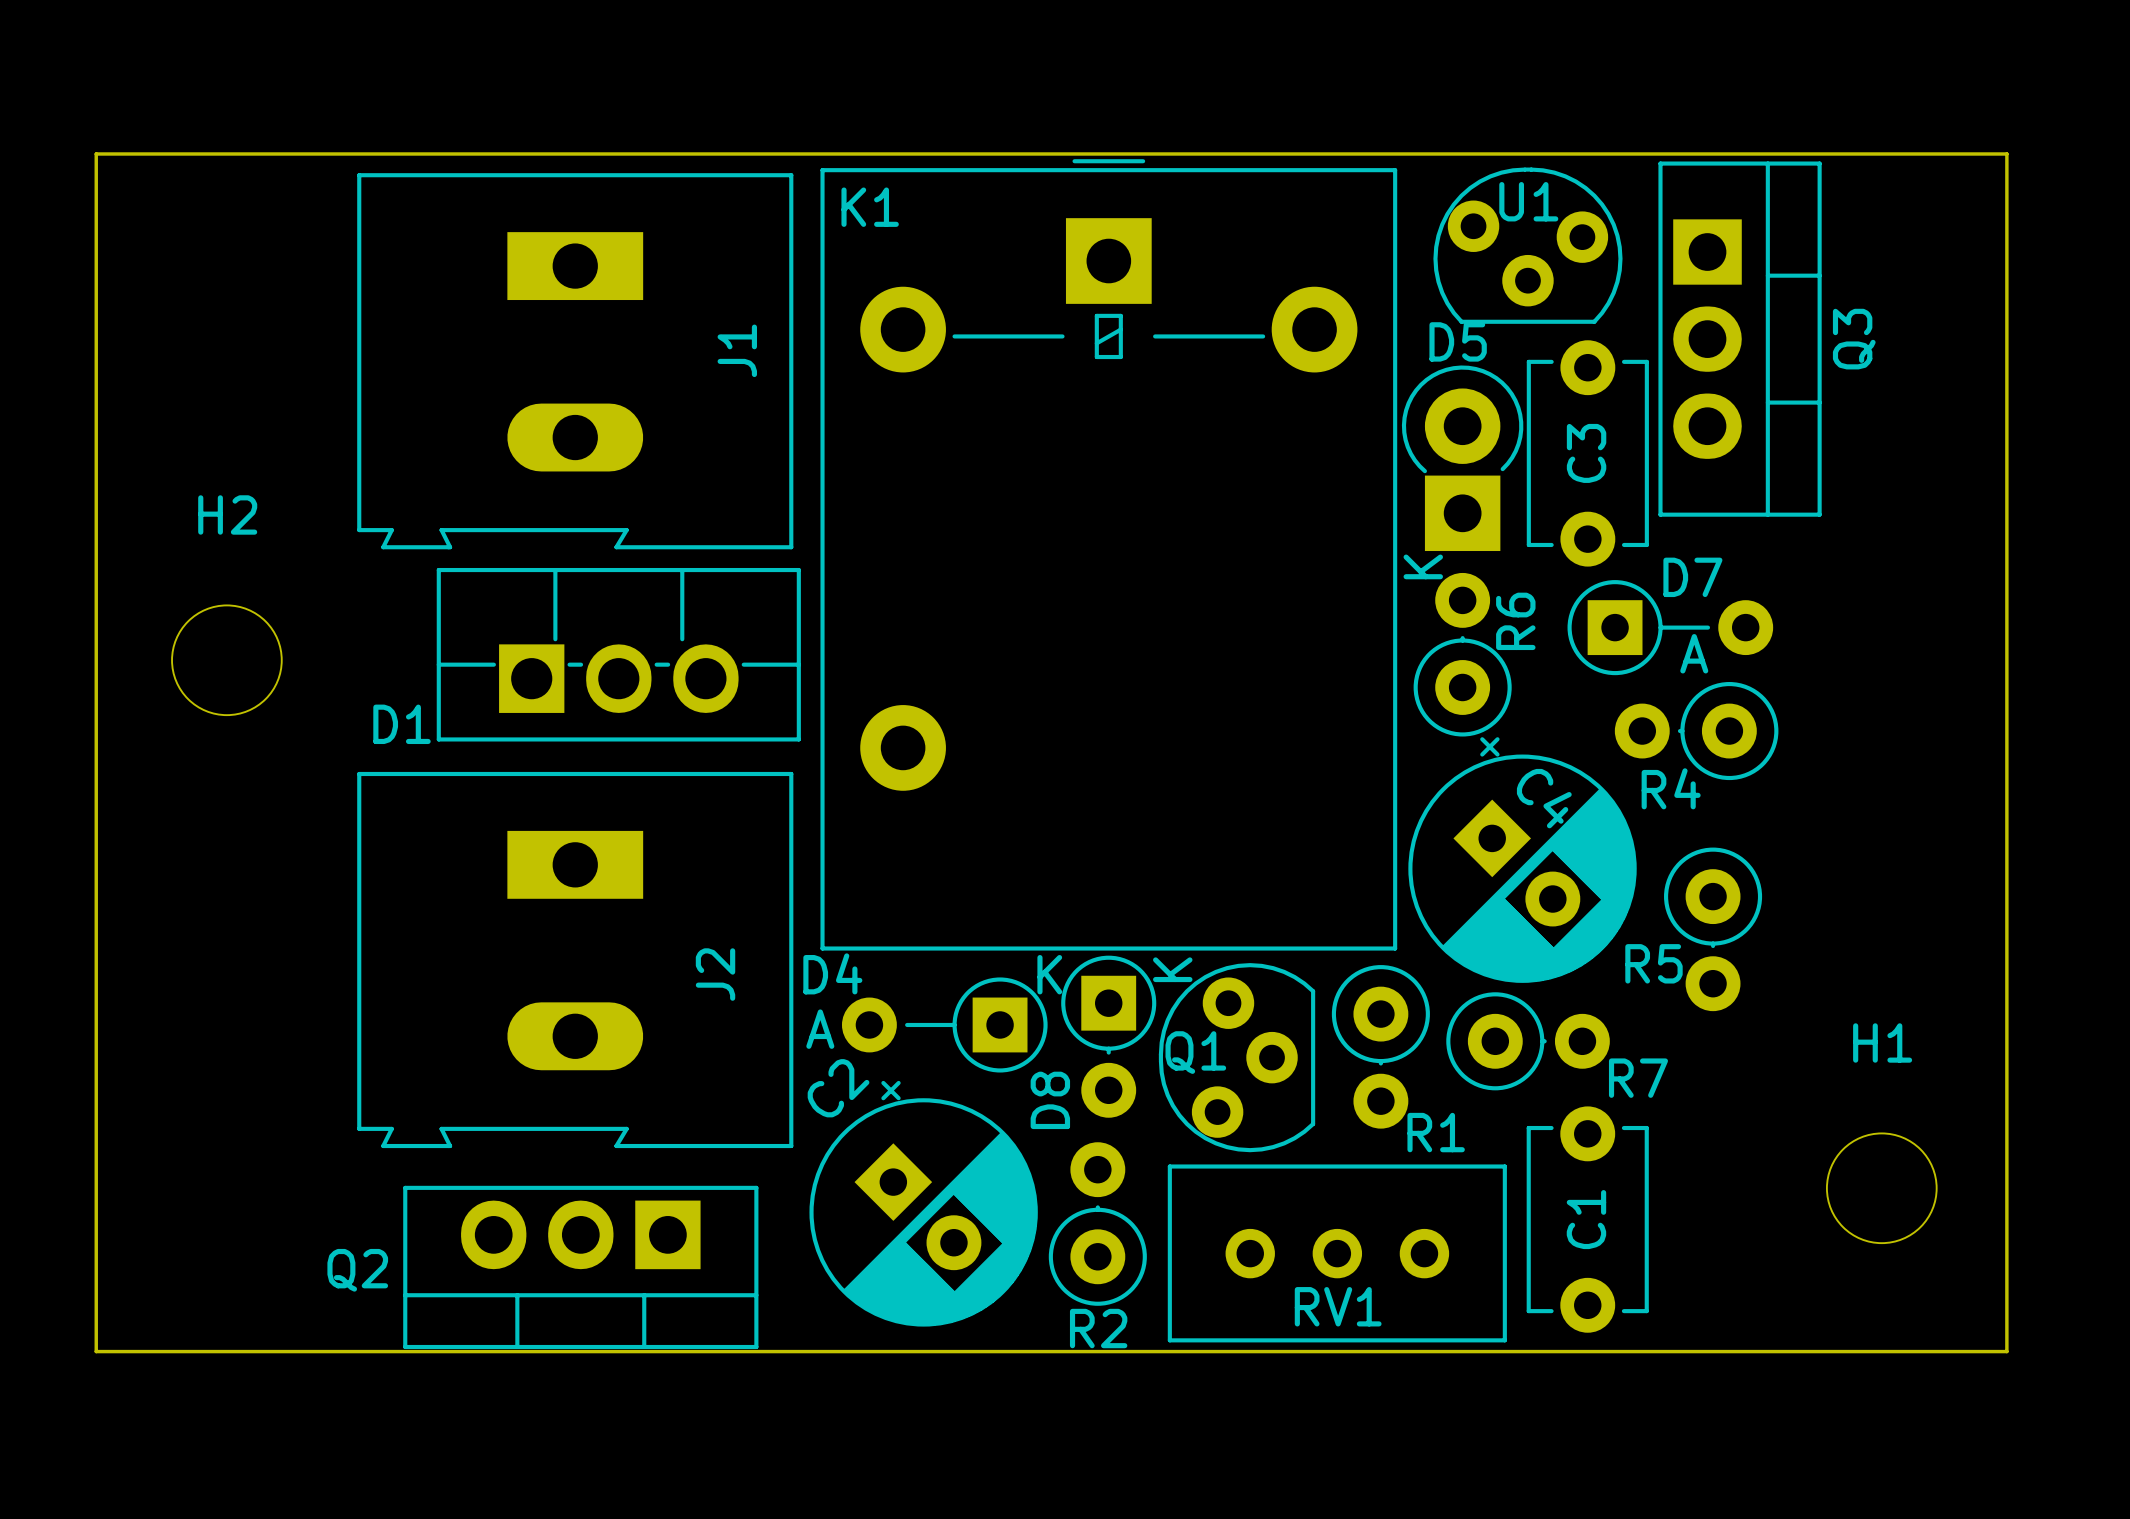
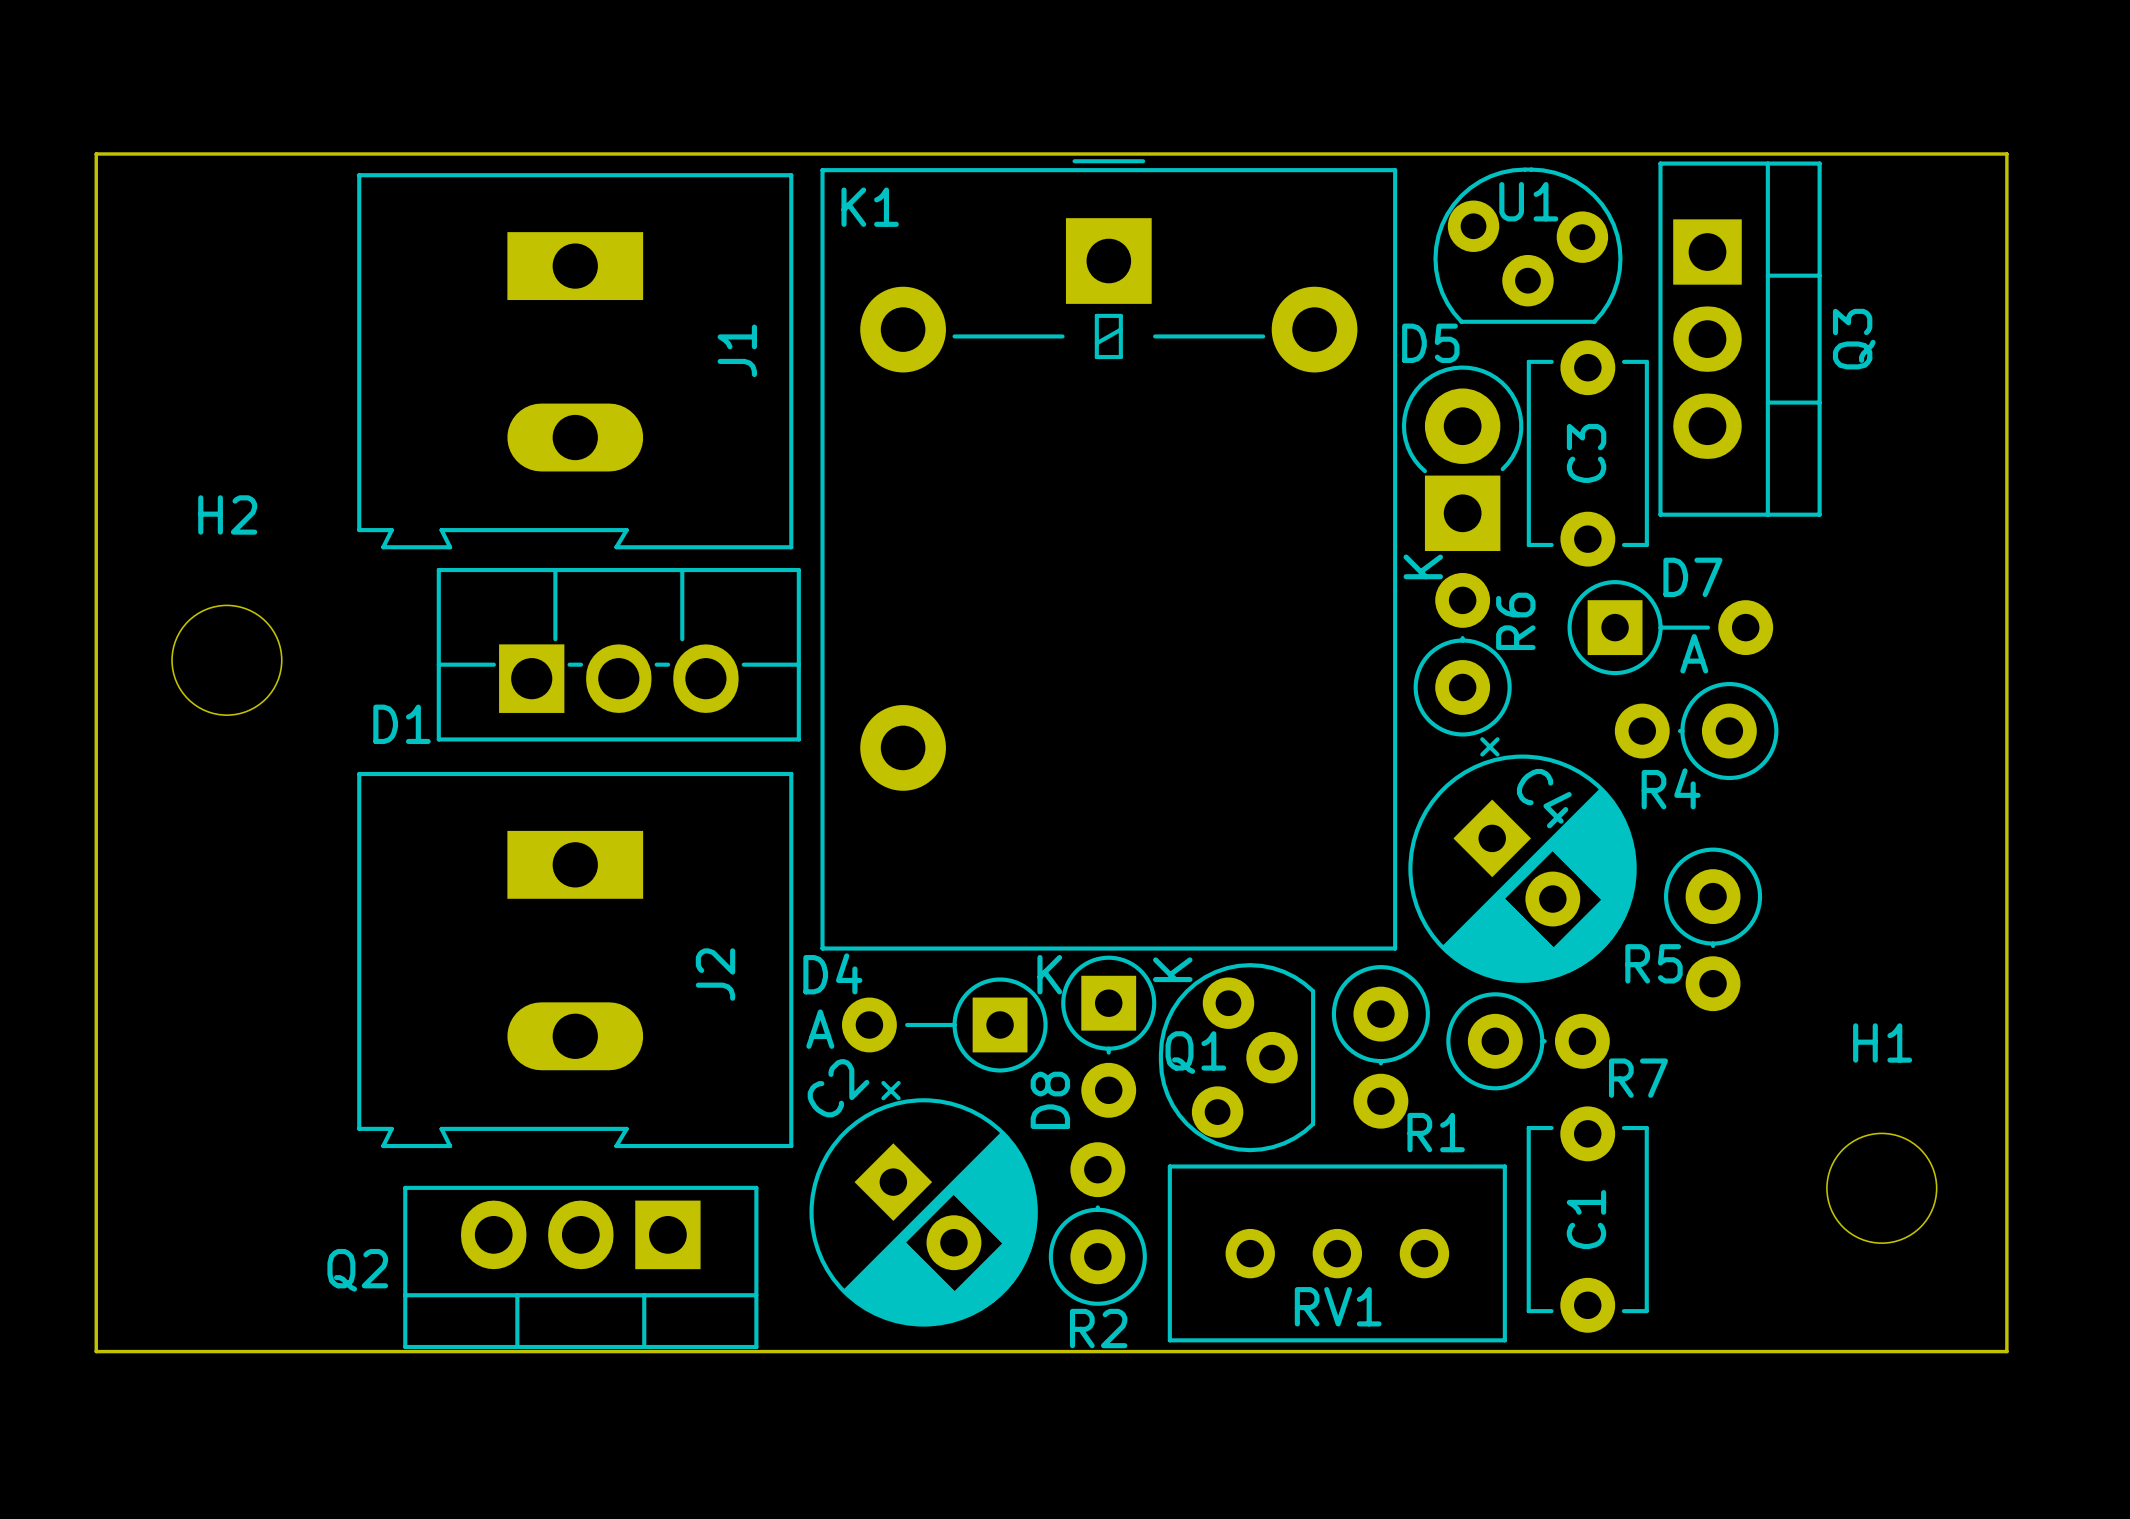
D5 name position: D5 (1458, 341) -> D5 (1430, 343)

